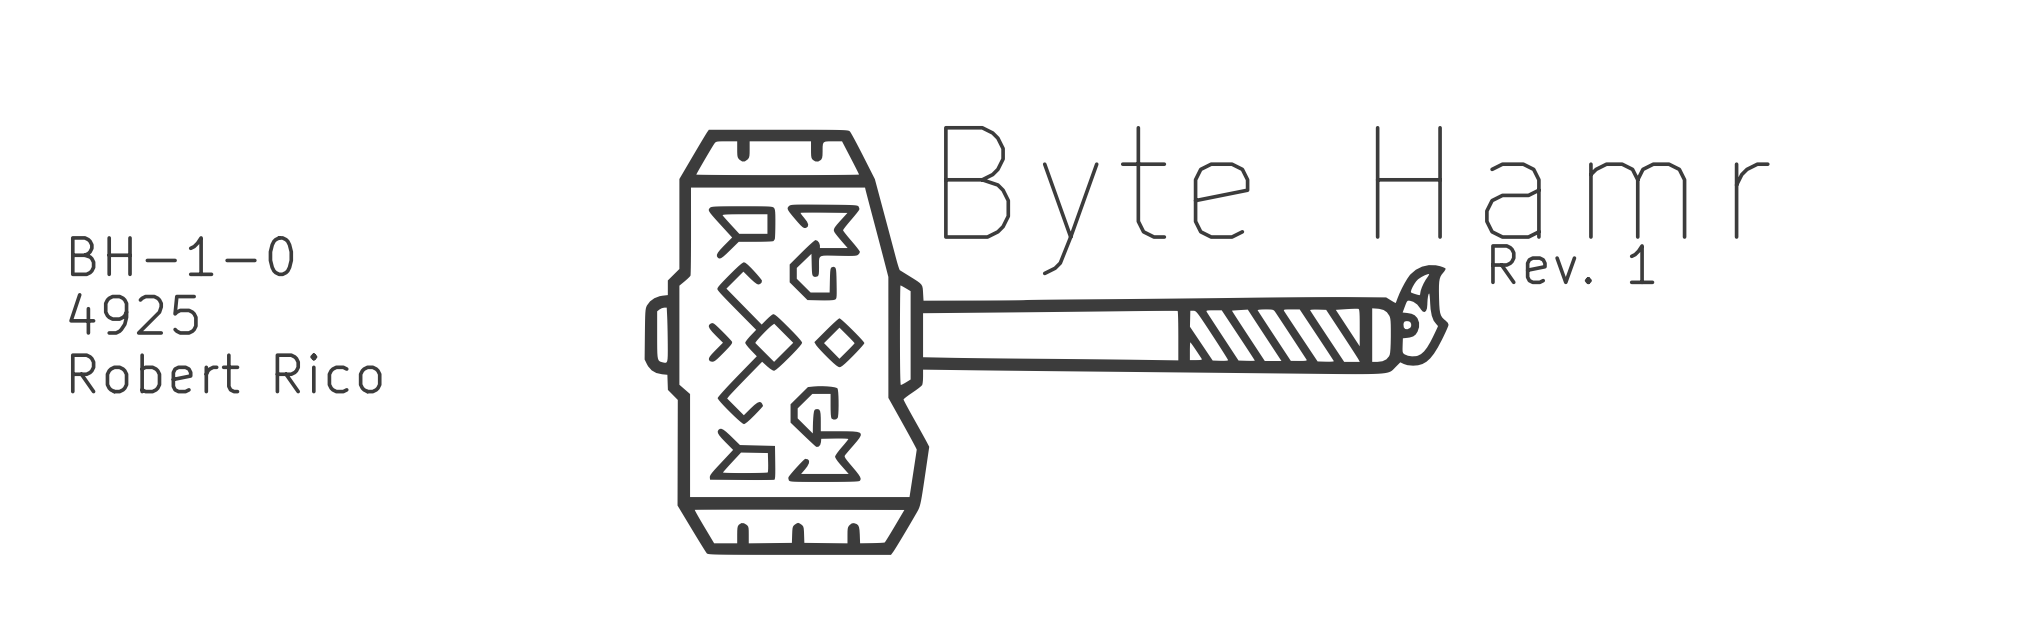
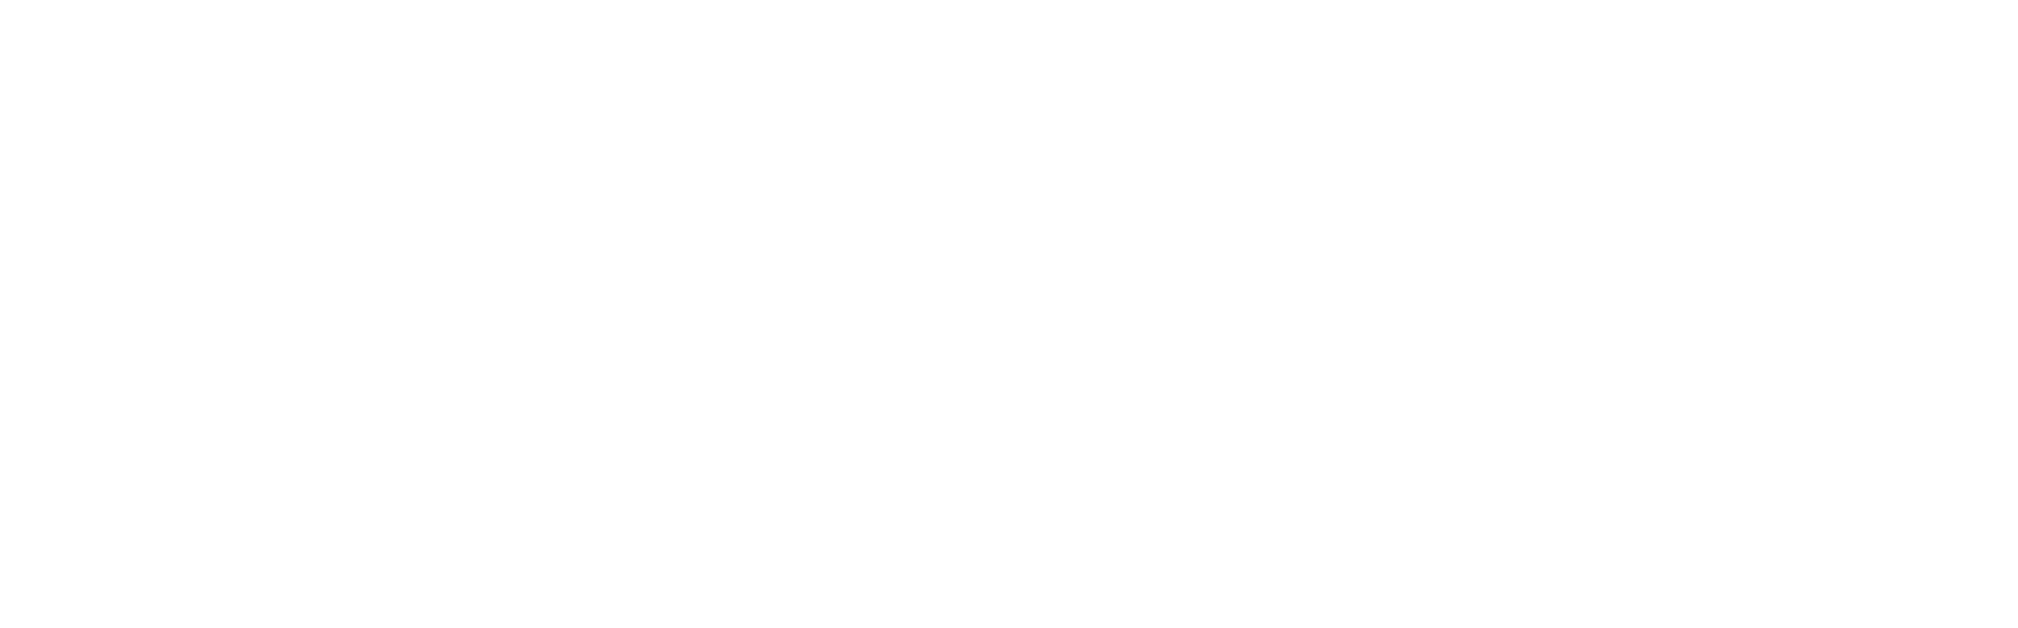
drawing: [644, 129, 1449, 555] -> none
text: Byte Hamr (1356, 200) -> none
text: BH-1-0 (182, 256) -> none
text: Rev. 1 (1572, 264) -> none
text: 4925 (133, 313) -> none
text: Robert Rico (226, 373) -> none

